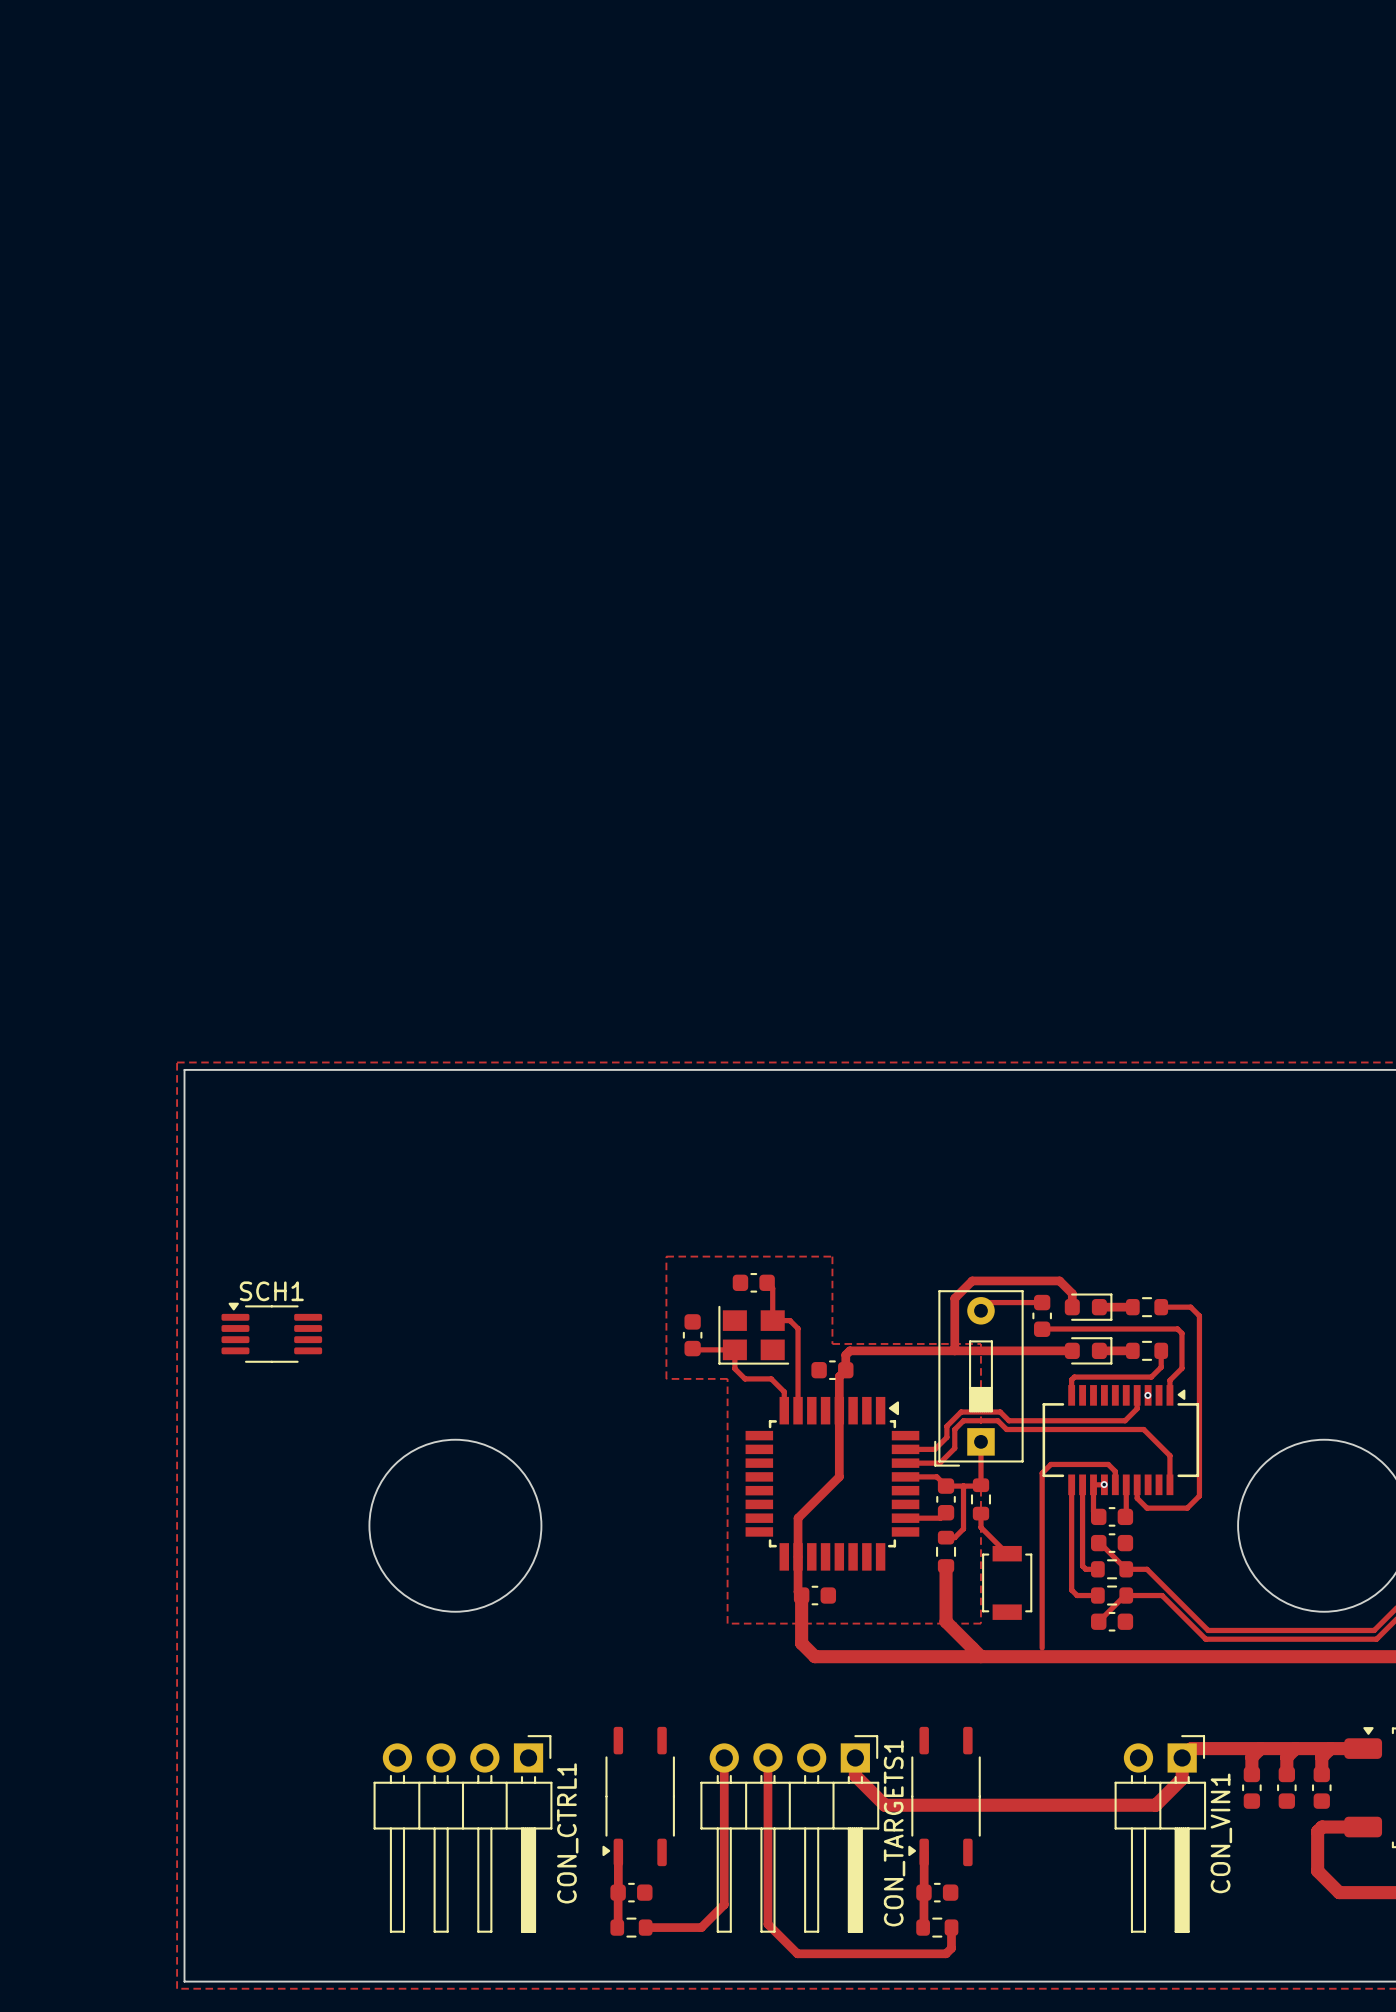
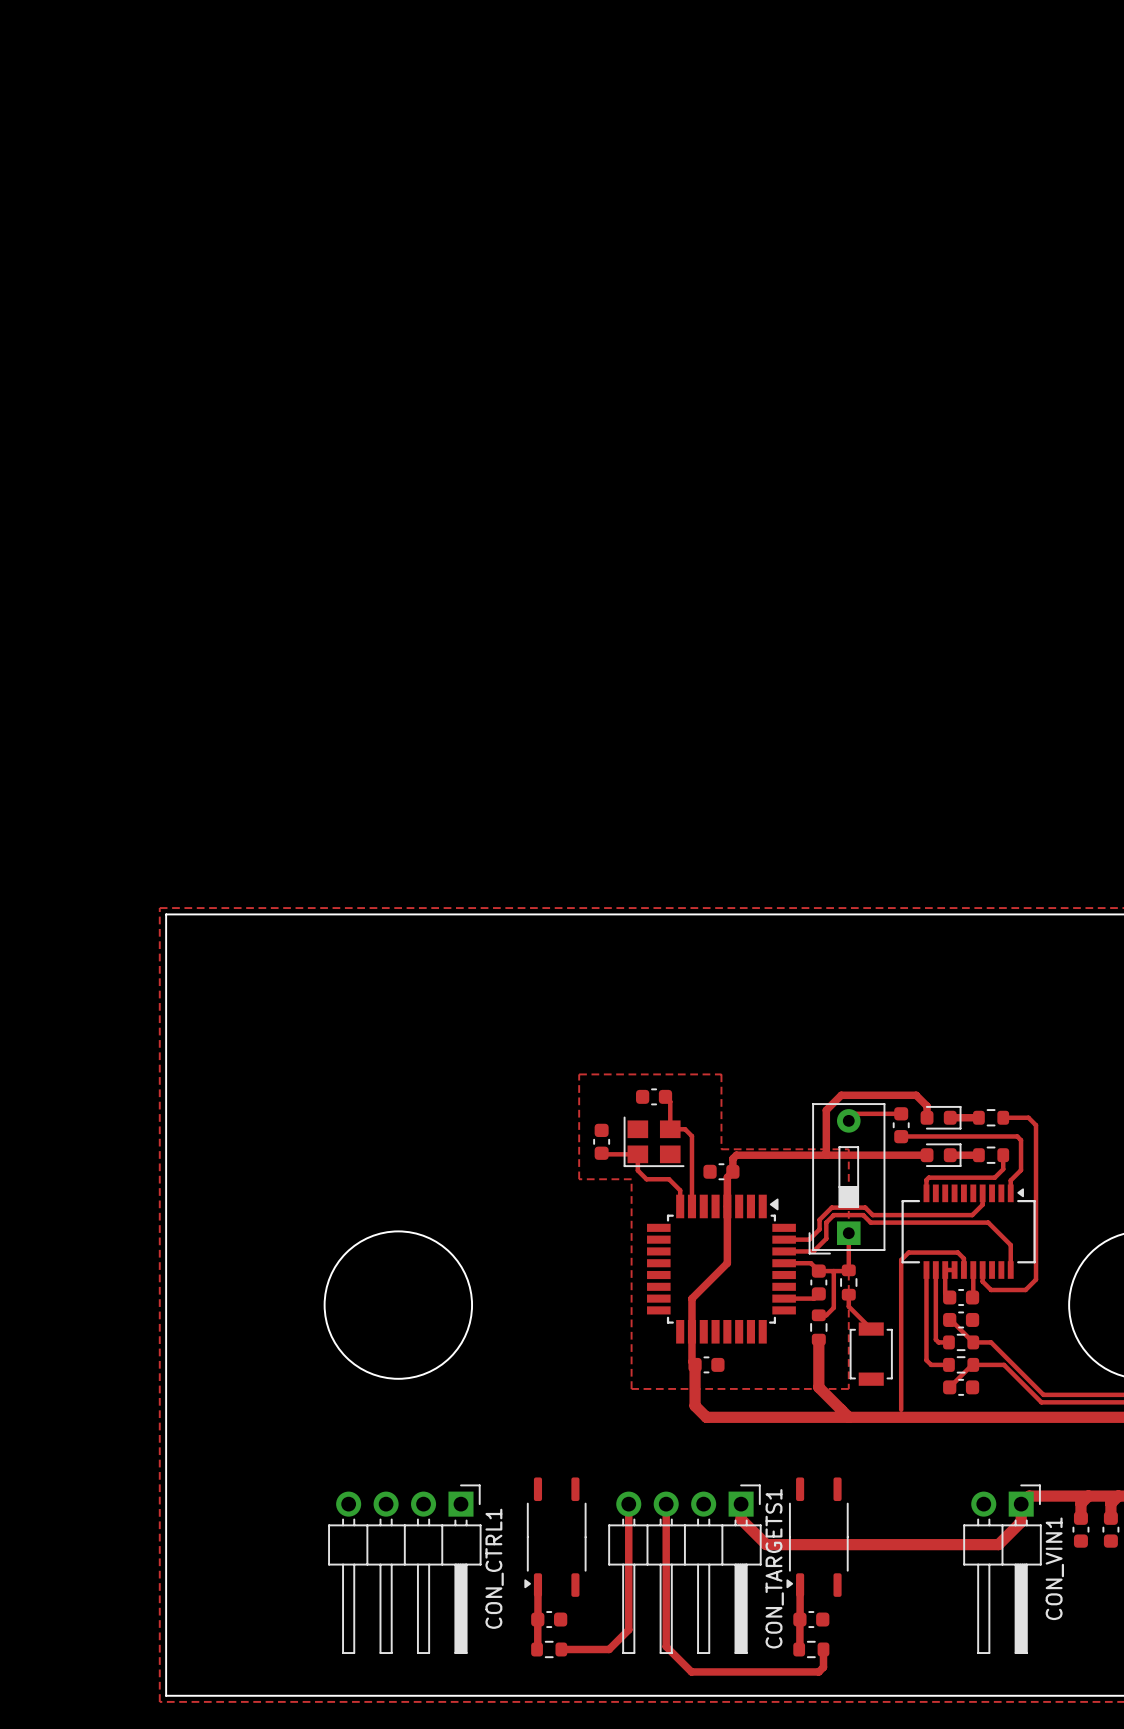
SCH1: (271, 1332) -> none
via: (1147, 1395) -> none
via: (1104, 1484) -> none

